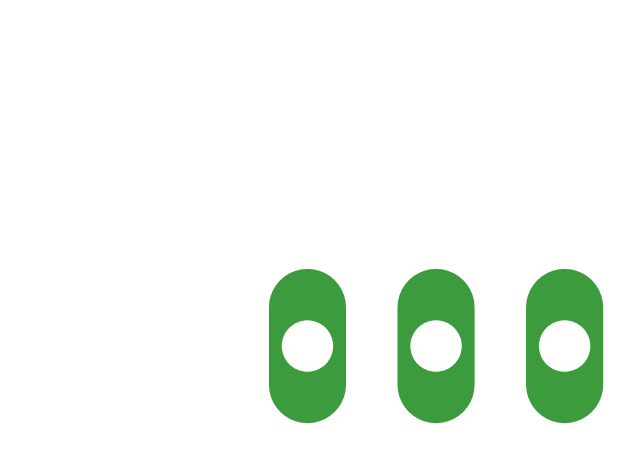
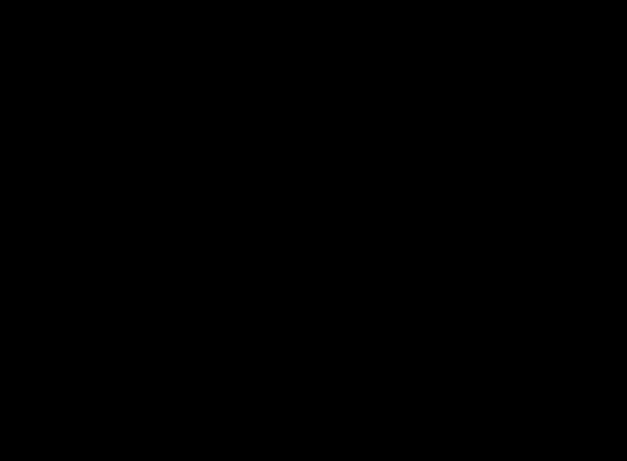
part: (436, 346) -> none

